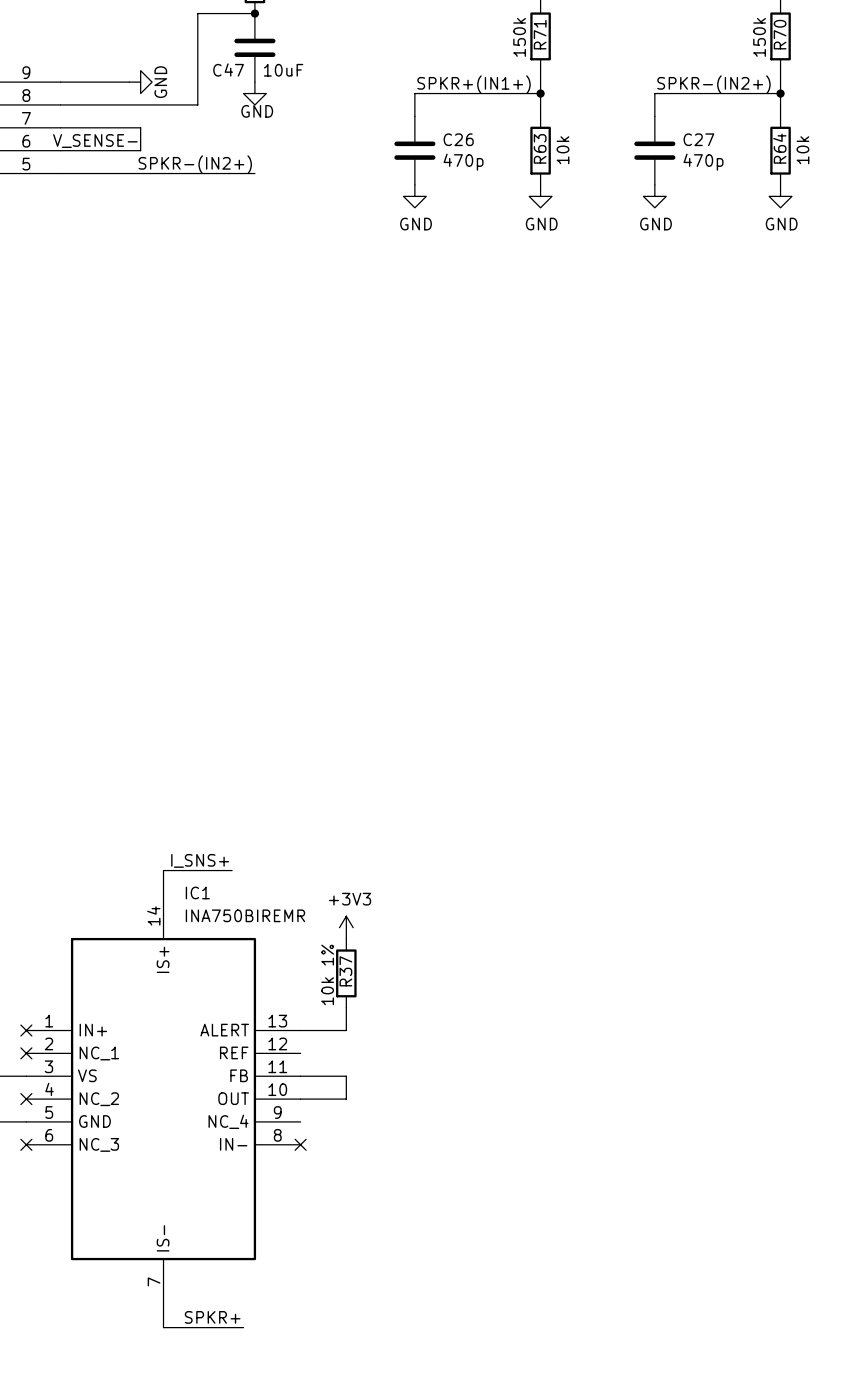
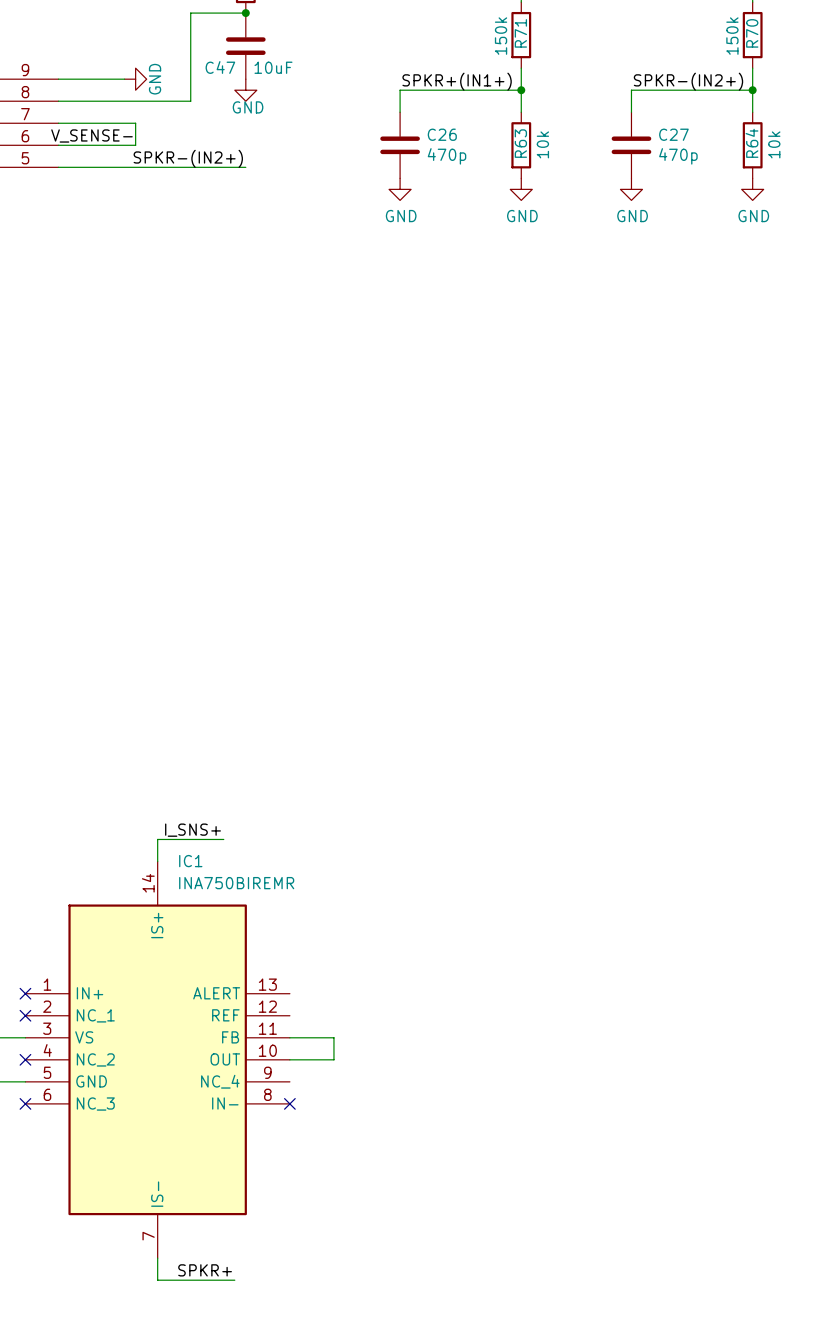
power symbol: +3V3 (346, 927) -> none
R37: 10k 1% (346, 973) -> none
wire: (346, 1007) (346, 1030) (300, 1030) -> none

